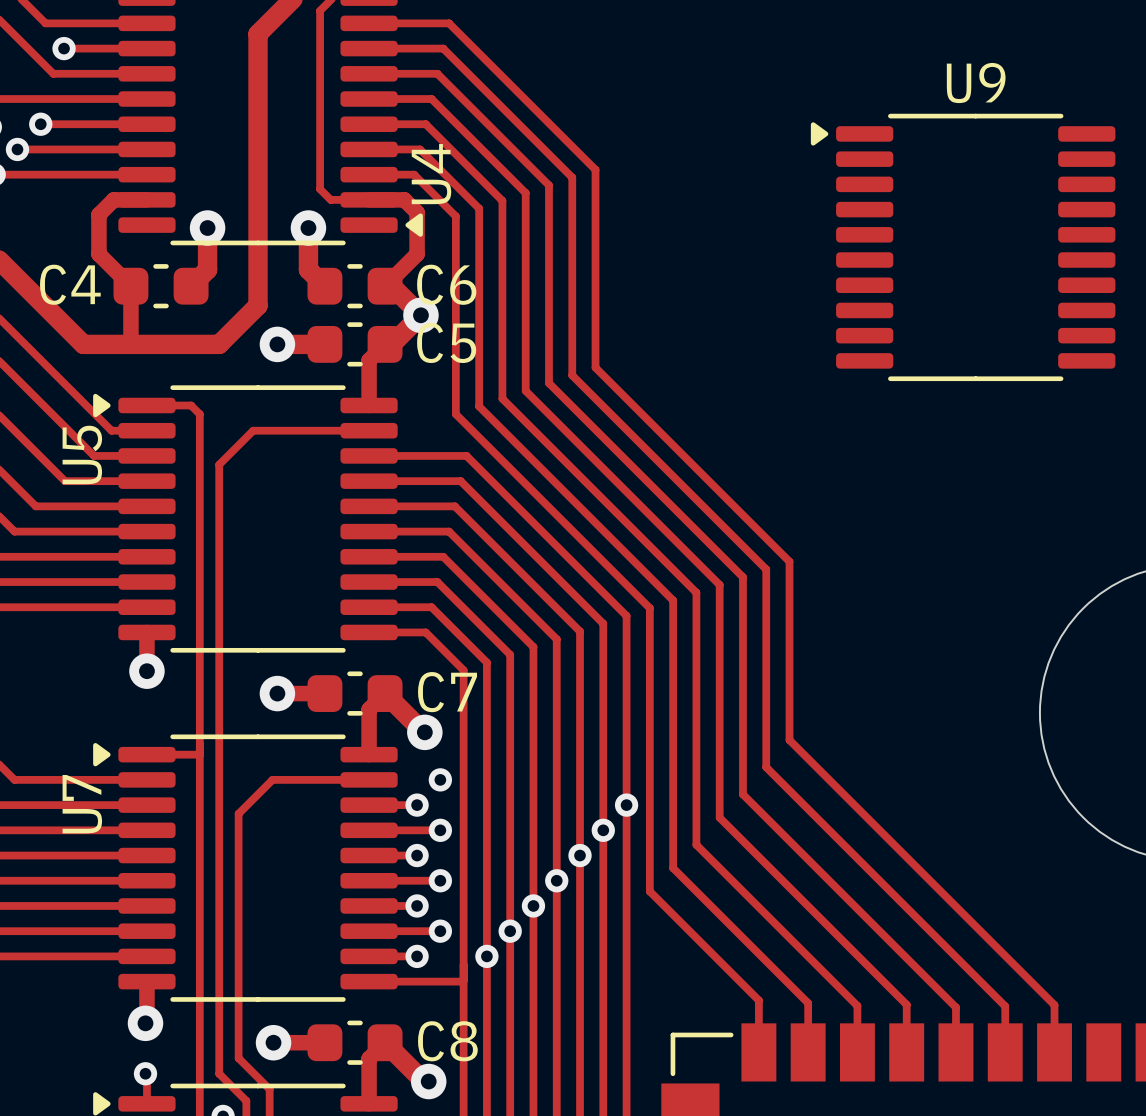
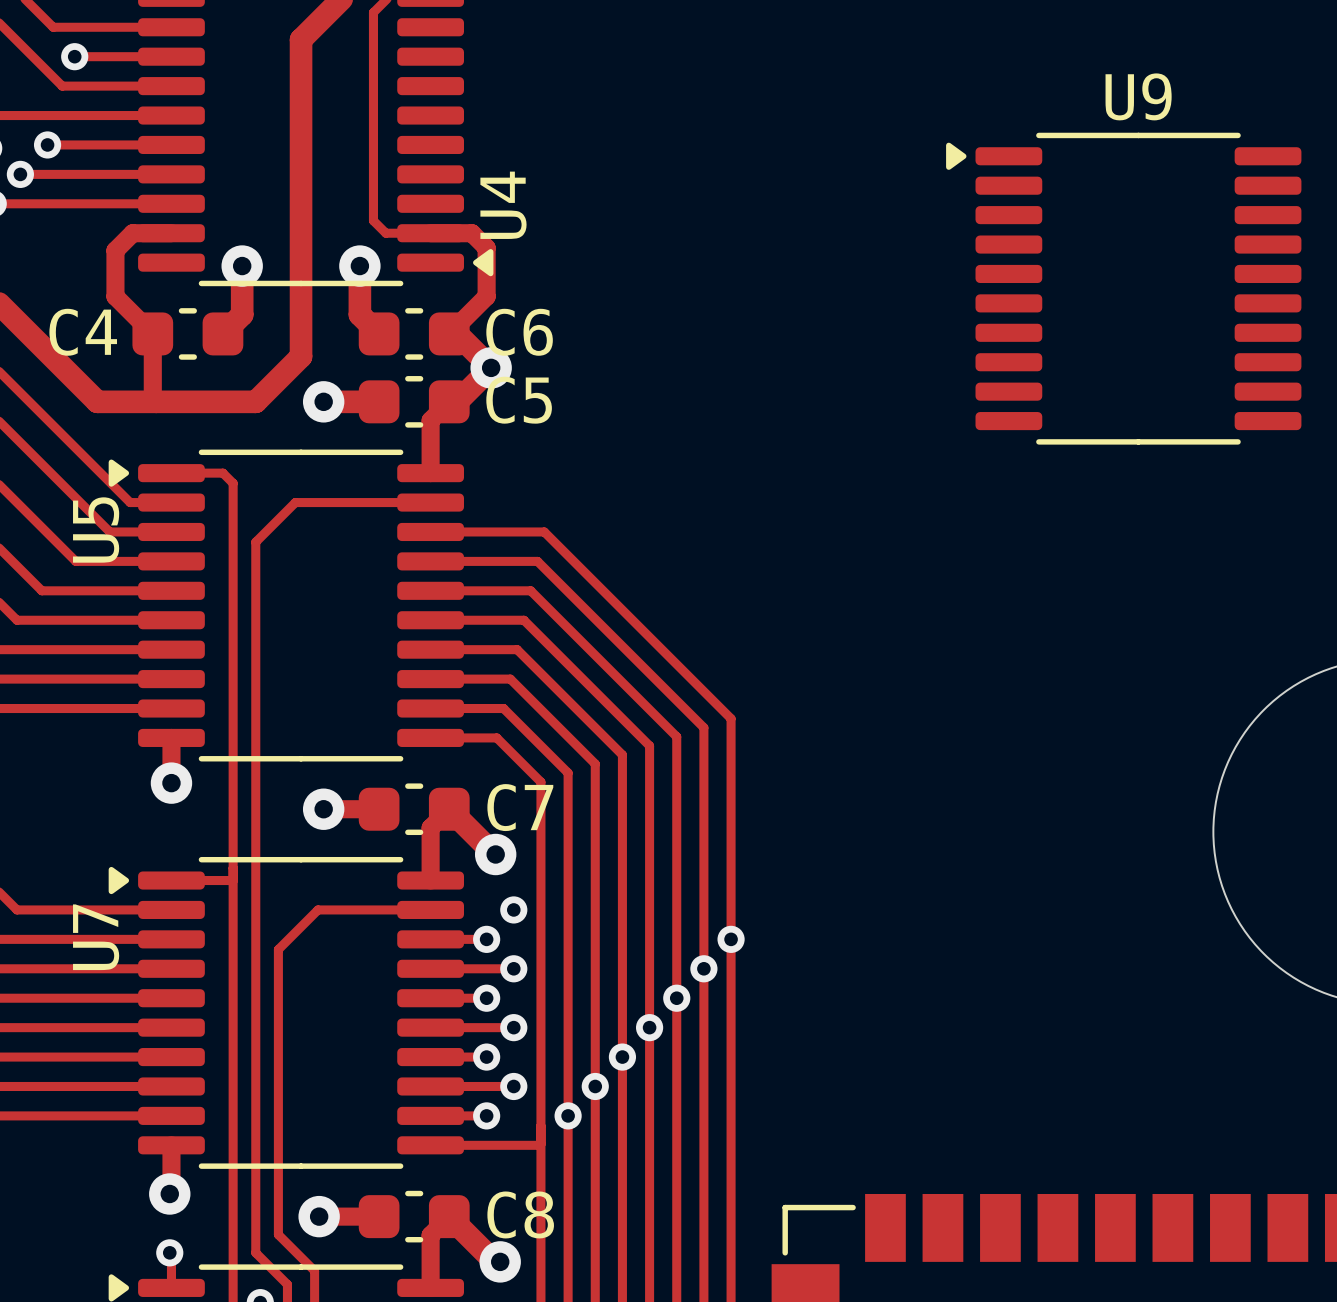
track: (369, 23) (449, 23) (595, 169) (595, 367) (789, 561) (789, 740) (1054, 1005) (1054, 1052) -> none
track: (369, 48) (443, 48) (572, 177) (572, 375) (766, 569) (766, 767) (1005, 1006) (1005, 1052) -> none
track: (369, 73) (437, 73) (548, 185) (548, 383) (742, 577) (742, 794) (955, 1007) (955, 1052) -> none
track: (369, 99) (431, 99) (525, 193) (525, 390) (719, 584) (719, 817) (906, 1004) (906, 1052) -> none
track: (369, 124) (425, 124) (502, 200) (502, 398) (696, 592) (696, 844) (857, 1005) (857, 1052) -> none
track: (369, 149) (419, 149) (479, 208) (479, 406) (673, 600) (673, 868) (808, 1003) (808, 1052) -> none
track: (369, 174) (414, 174) (455, 216) (455, 414) (649, 608) (649, 891) (758, 1000) (758, 1052) -> none

